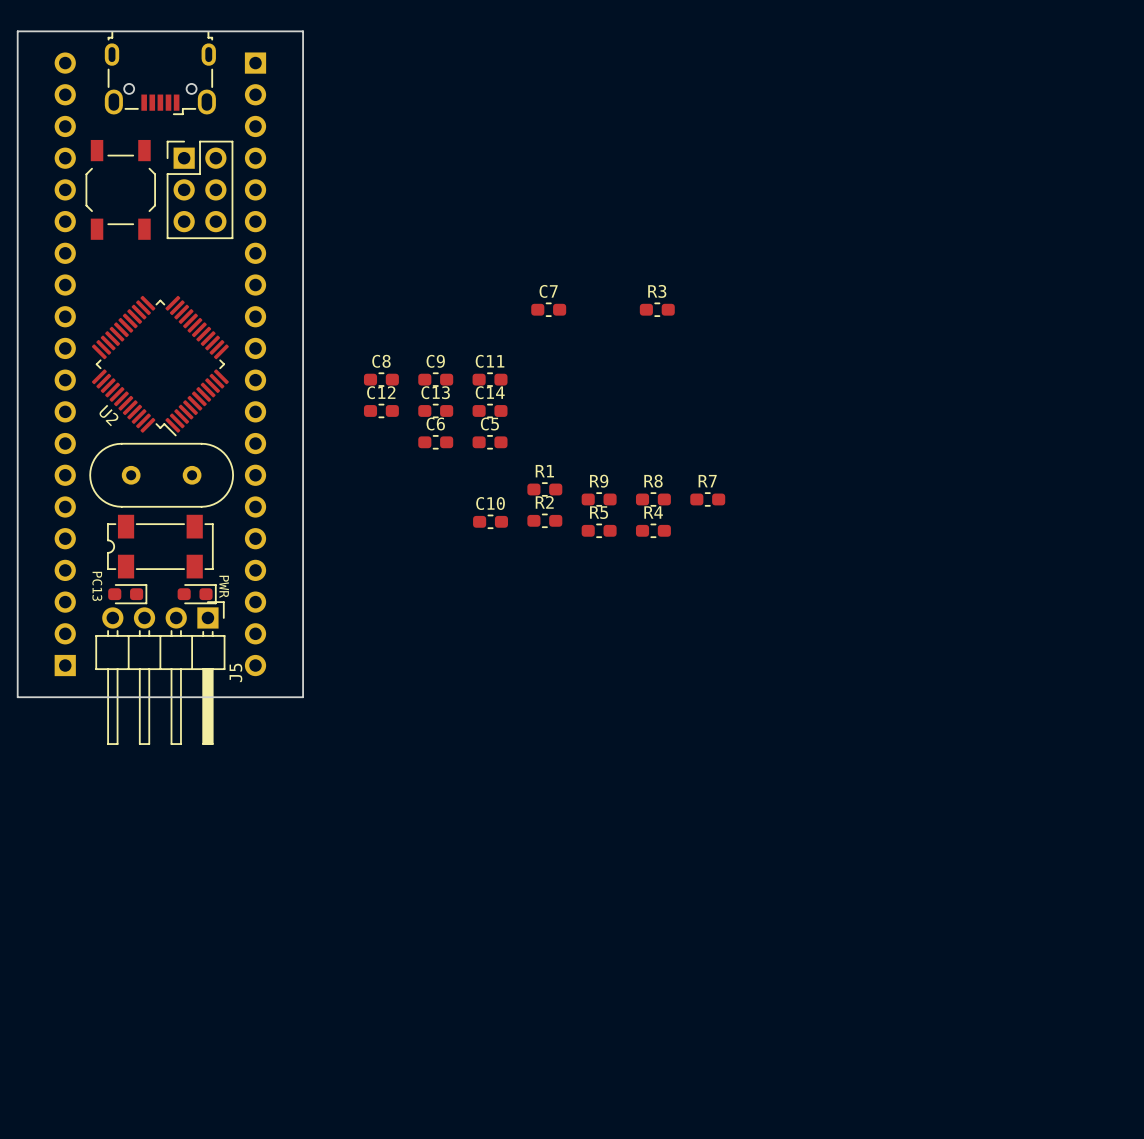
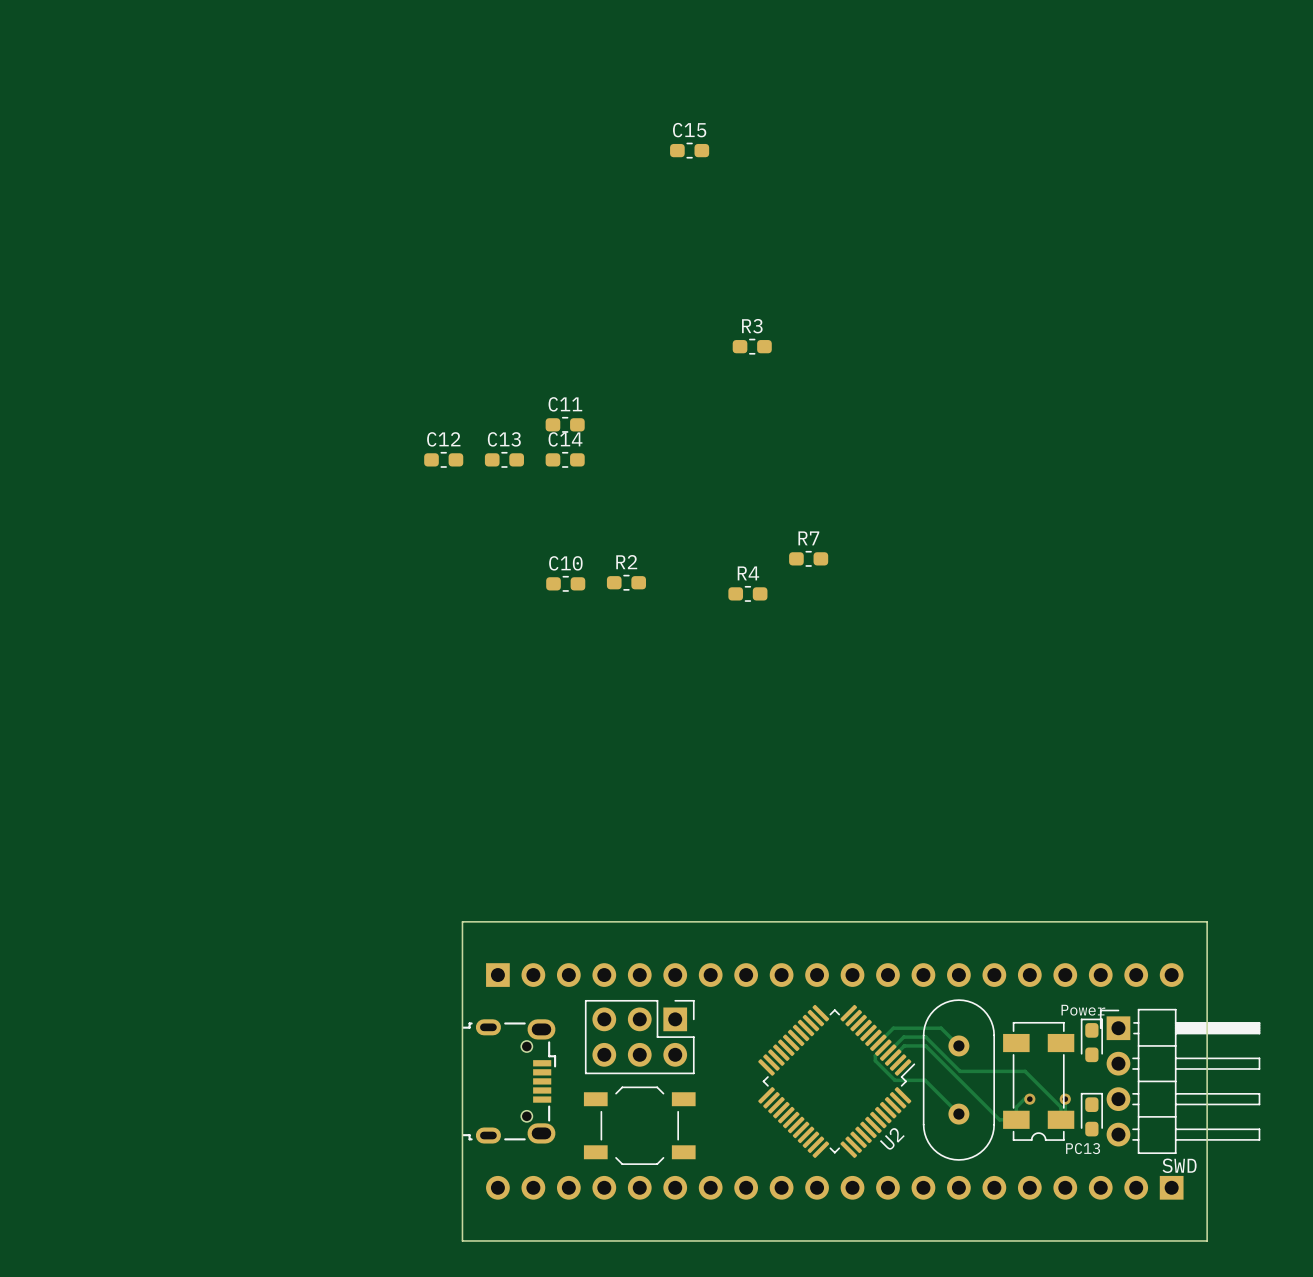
board edge: (17, 31) (17, 697) (303, 697) (303, 31) (17, 31) -> none
part: (160, 73) -> none
C15: none -> (689, 150)
part: (120, 189) -> none
part: (200, 189) -> none
C7: (548, 309) -> none
part: (65, 364) -> none
part: (255, 364) -> none
U2 rotation: 0° (160, 366) -> 90° counterclockwise (836, 1081)
U2 position: (160, 366) -> (836, 1081)
C8: (381, 379) -> none
C9: (435, 379) -> none
C6: (435, 442) -> none
C5: (490, 442) -> none
part: (161, 475) -> none
R1: (544, 489) -> none
R9: (599, 499) -> none
R8: (653, 499) -> none
R5: (599, 530) -> none
part: (160, 546) -> none
part: PC13 (127, 594) -> none
part: PWR (197, 594) -> none
J5: (160, 673) -> none
board edge: none -> (462, 921) (1207, 921) (1207, 1240) (462, 1240) (462, 921)
part: none -> (834, 975)
part: none -> (639, 1037)
part: none -> Power (1091, 1040)
track: none -> (878, 1042) (893, 1028) (941, 1028) (958, 1045)
track: none -> (883, 1047) (875, 1055) (875, 1060) (894, 1080) (925, 1080) (958, 1114)
track: none -> (888, 1052) (903, 1037) (925, 1037) (960, 1071) (1025, 1071) (1061, 1107) (1061, 1119) (1065, 1115) (1065, 1099)
track: none -> (893, 1057) (904, 1045) (925, 1045) (999, 1119) (1016, 1119) (1016, 1107) (1024, 1099) (1029, 1099)
part: none -> (958, 1080)
part: none -> (509, 1081)
part: none -> (1038, 1081)
part: none -> SWD (1180, 1081)
via: none -> (1029, 1099)
via: none -> (1065, 1099)
part: none -> PC13 (1091, 1114)
part: none -> (639, 1125)
part: none -> (834, 1187)

